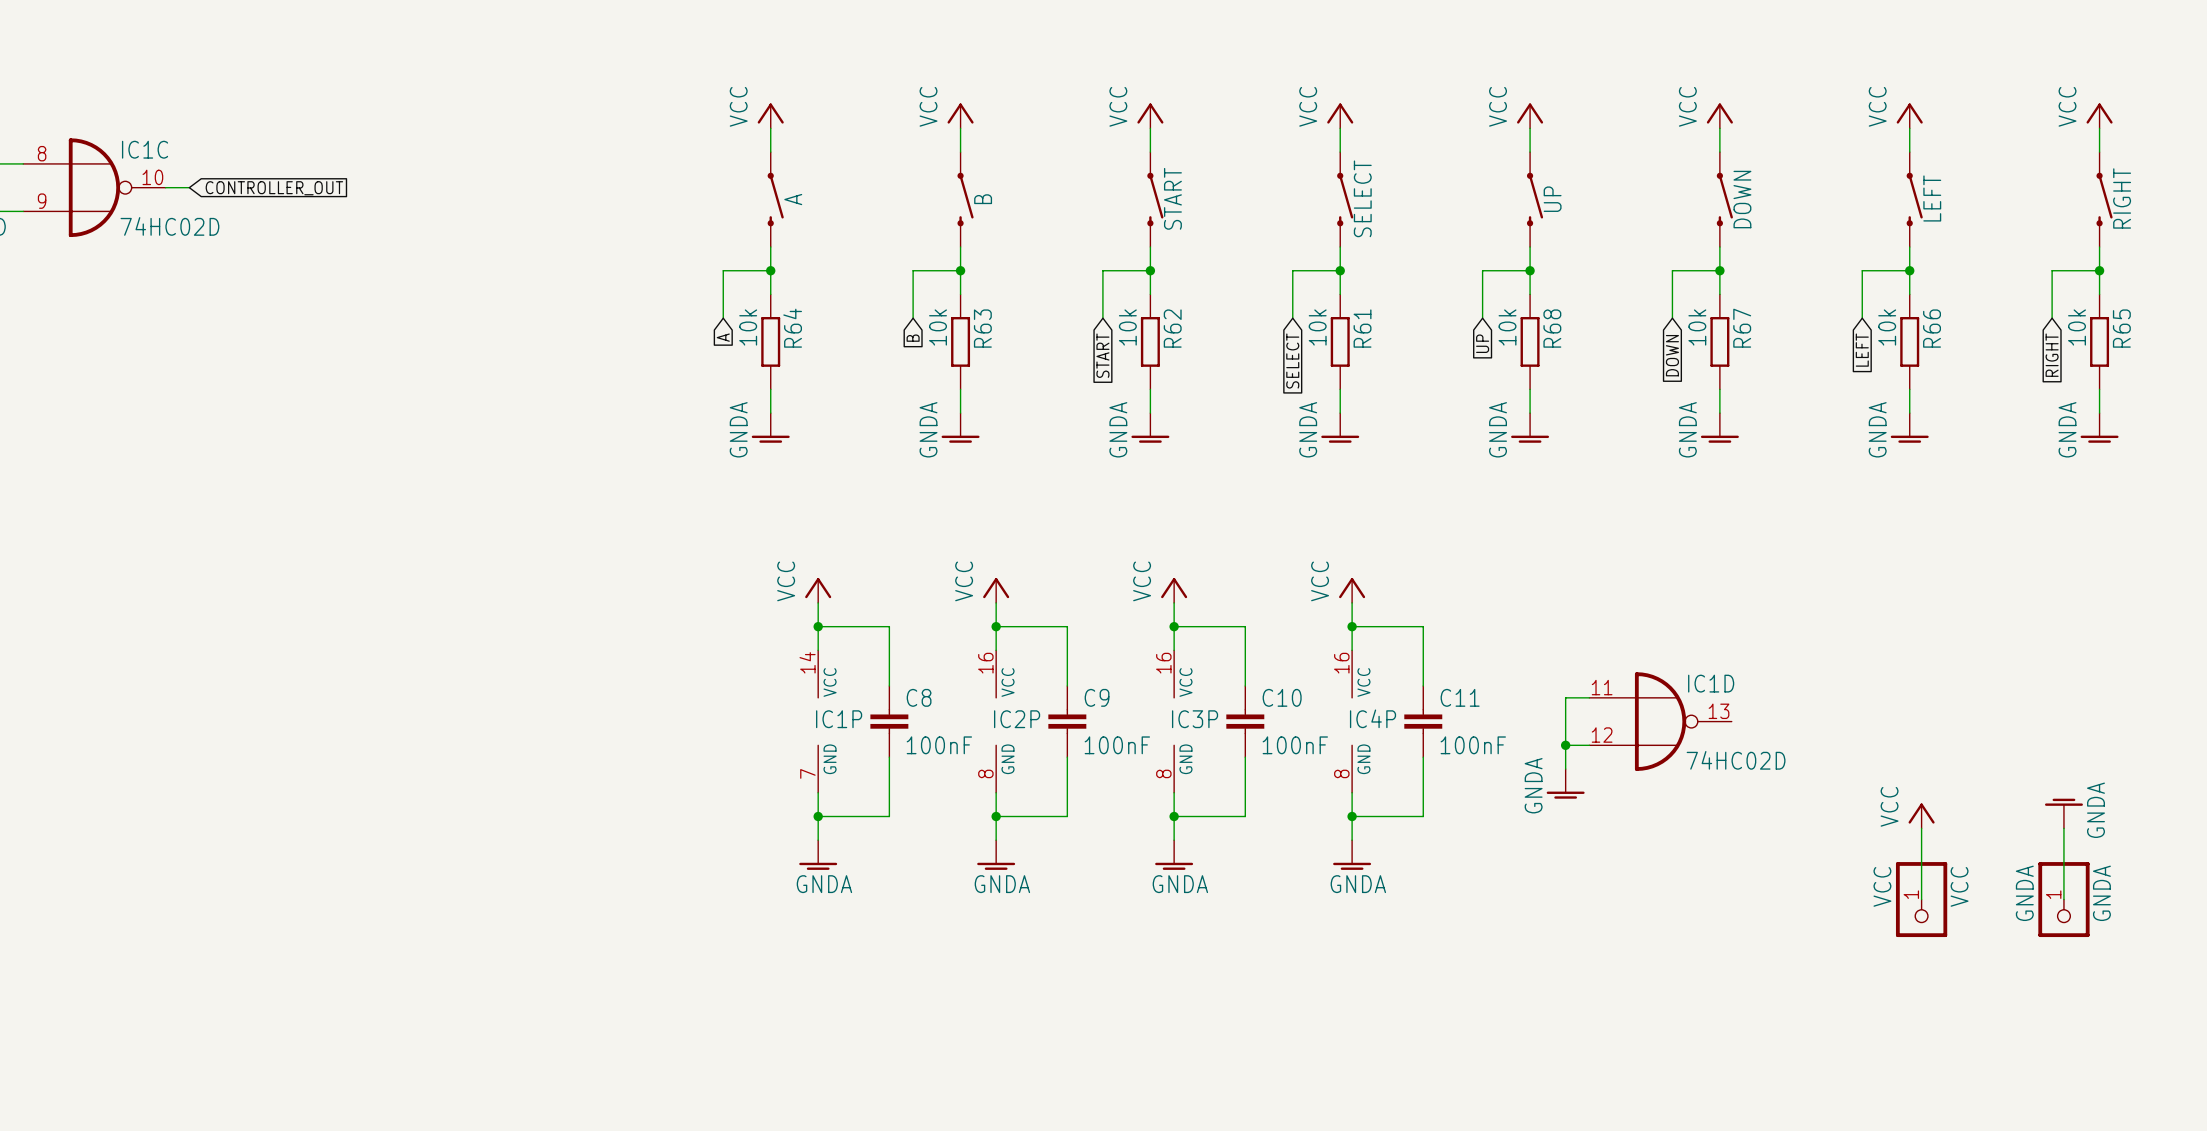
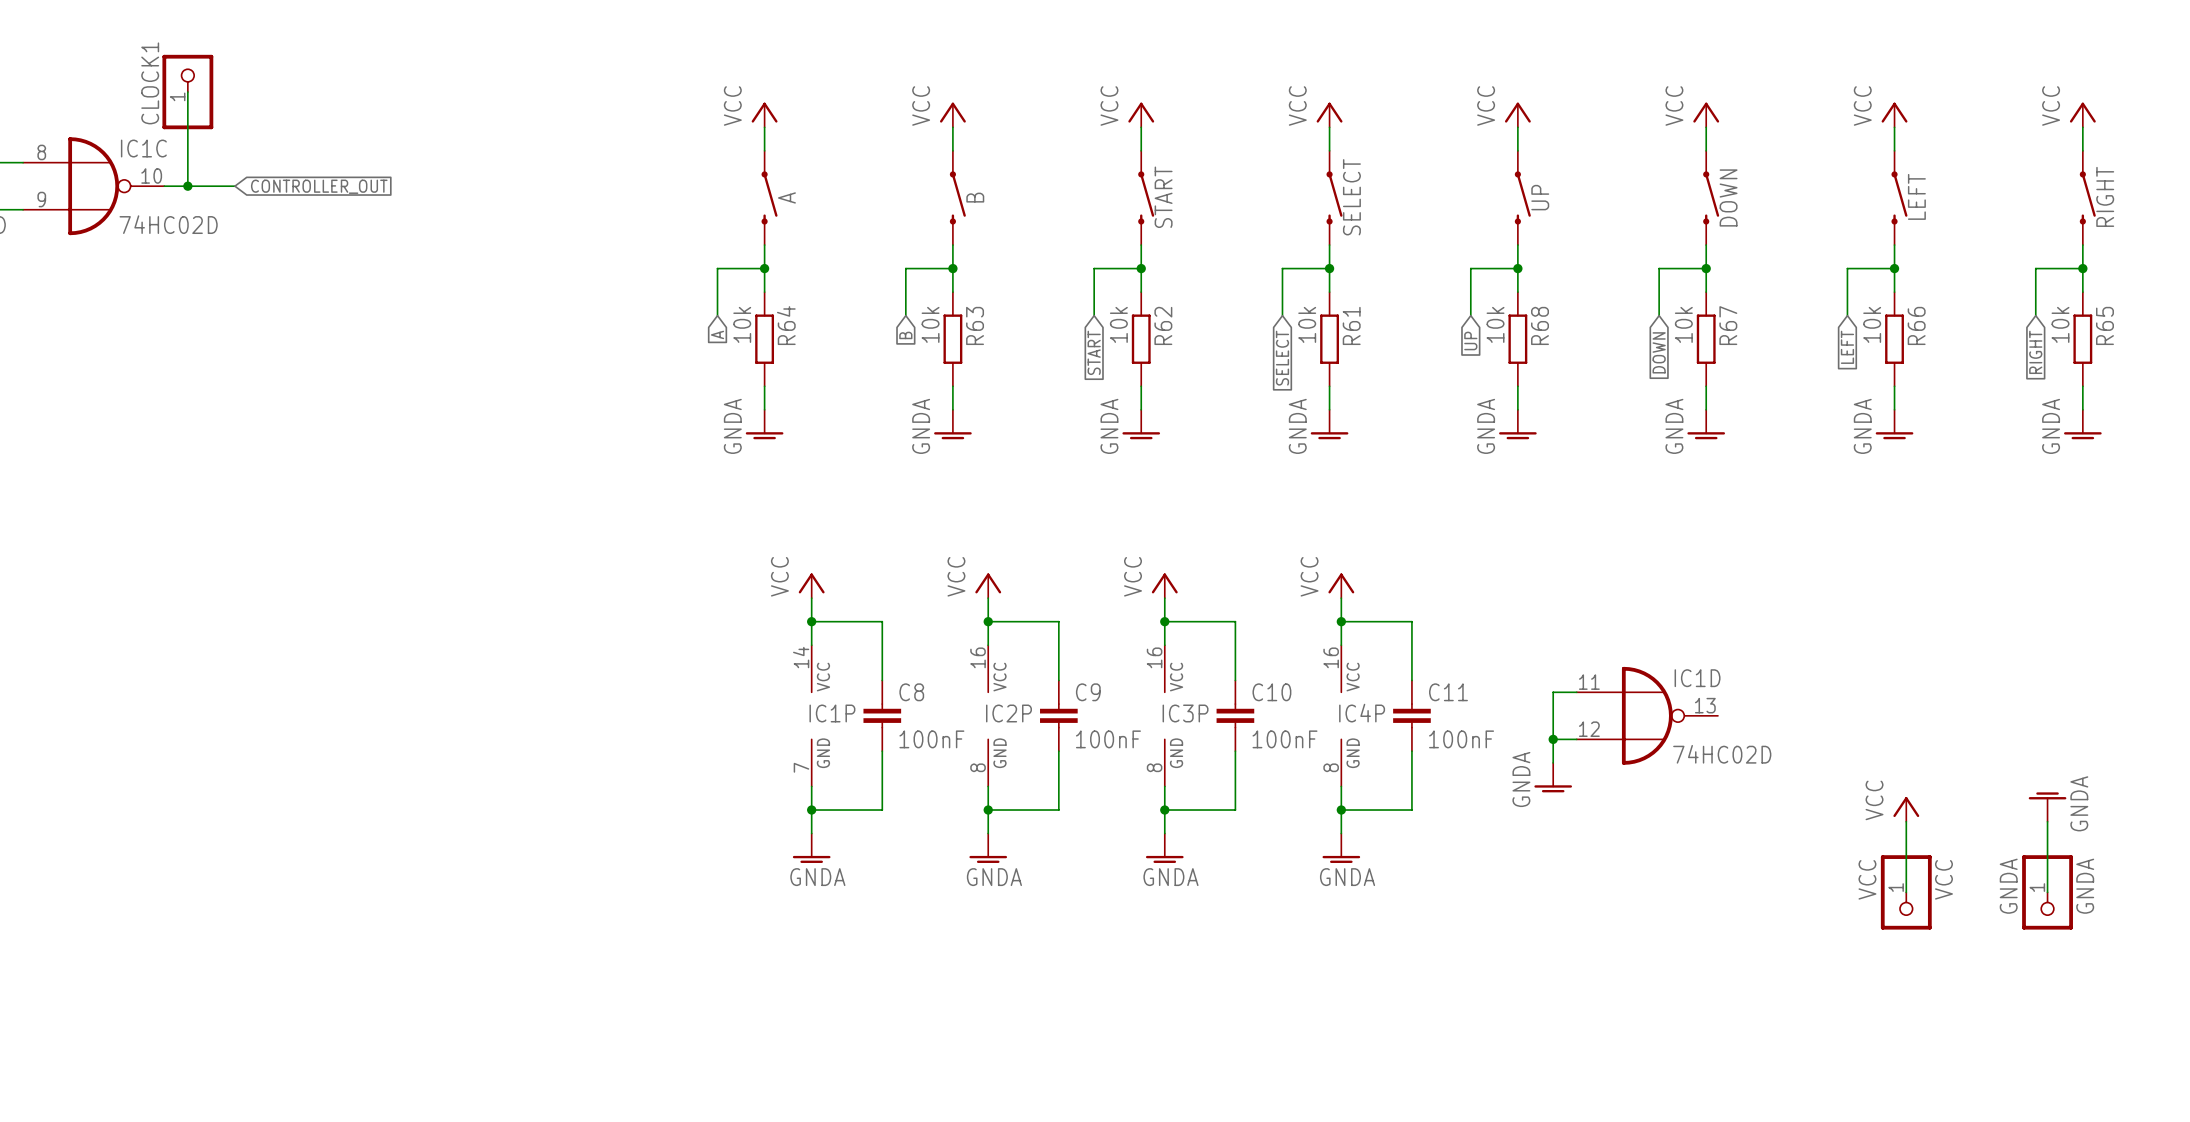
wire: none -> (187, 92) (187, 186) (234, 186)
CLOCK1: none -> (187, 92)
junction: none -> (187, 186)
global label position: CONTROLLER_OUT (274, 188) -> CONTROLLER_OUT (319, 186)

